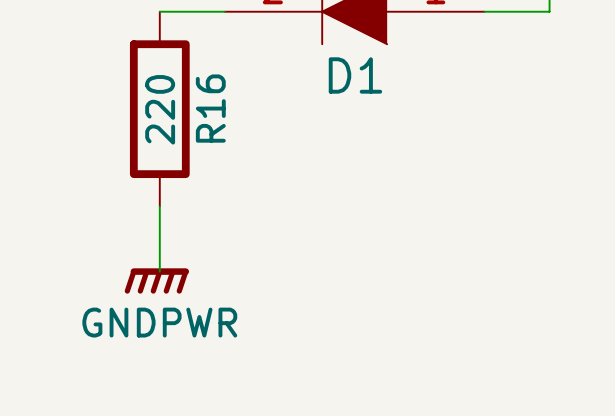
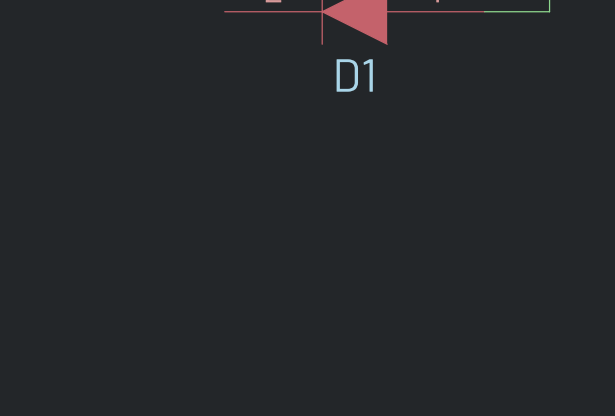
wire: (159, 11) (224, 11) -> none
R16: 220 (159, 109) -> none
wire: (159, 206) (159, 271) -> none
power symbol: GNDPWR (156, 280) -> none

